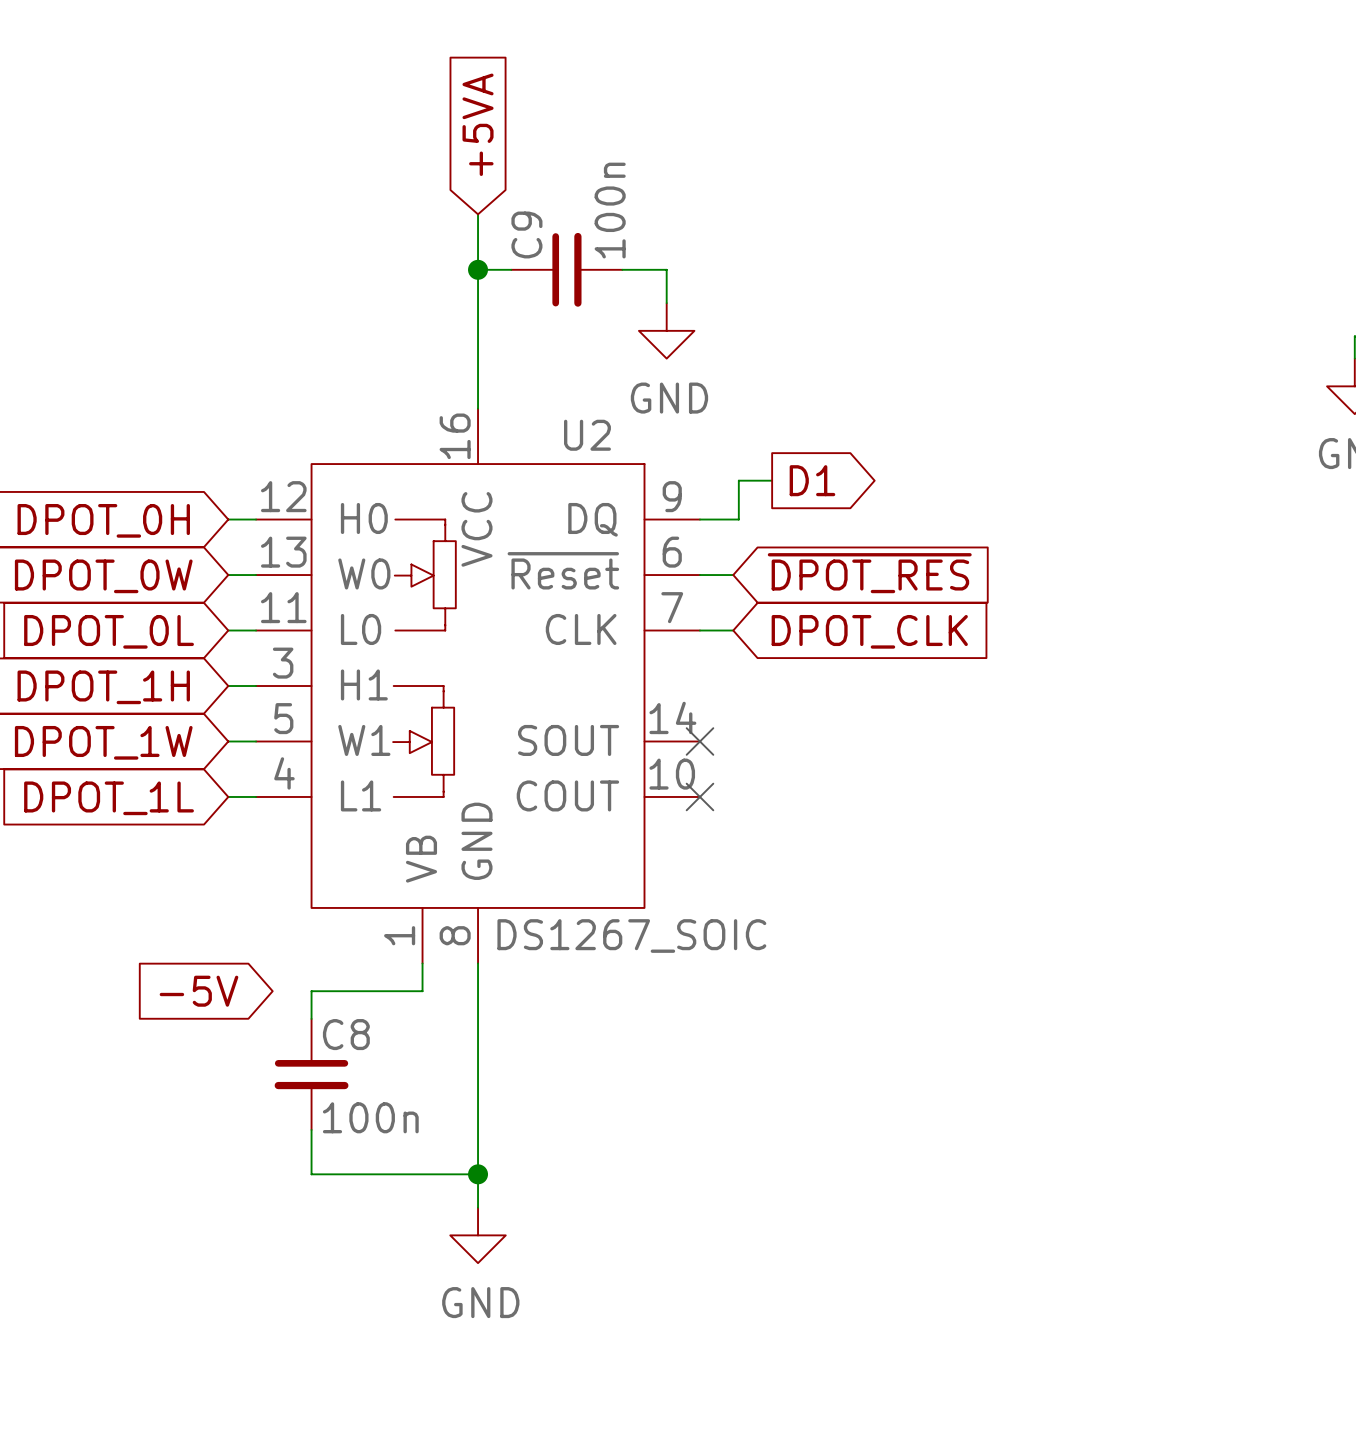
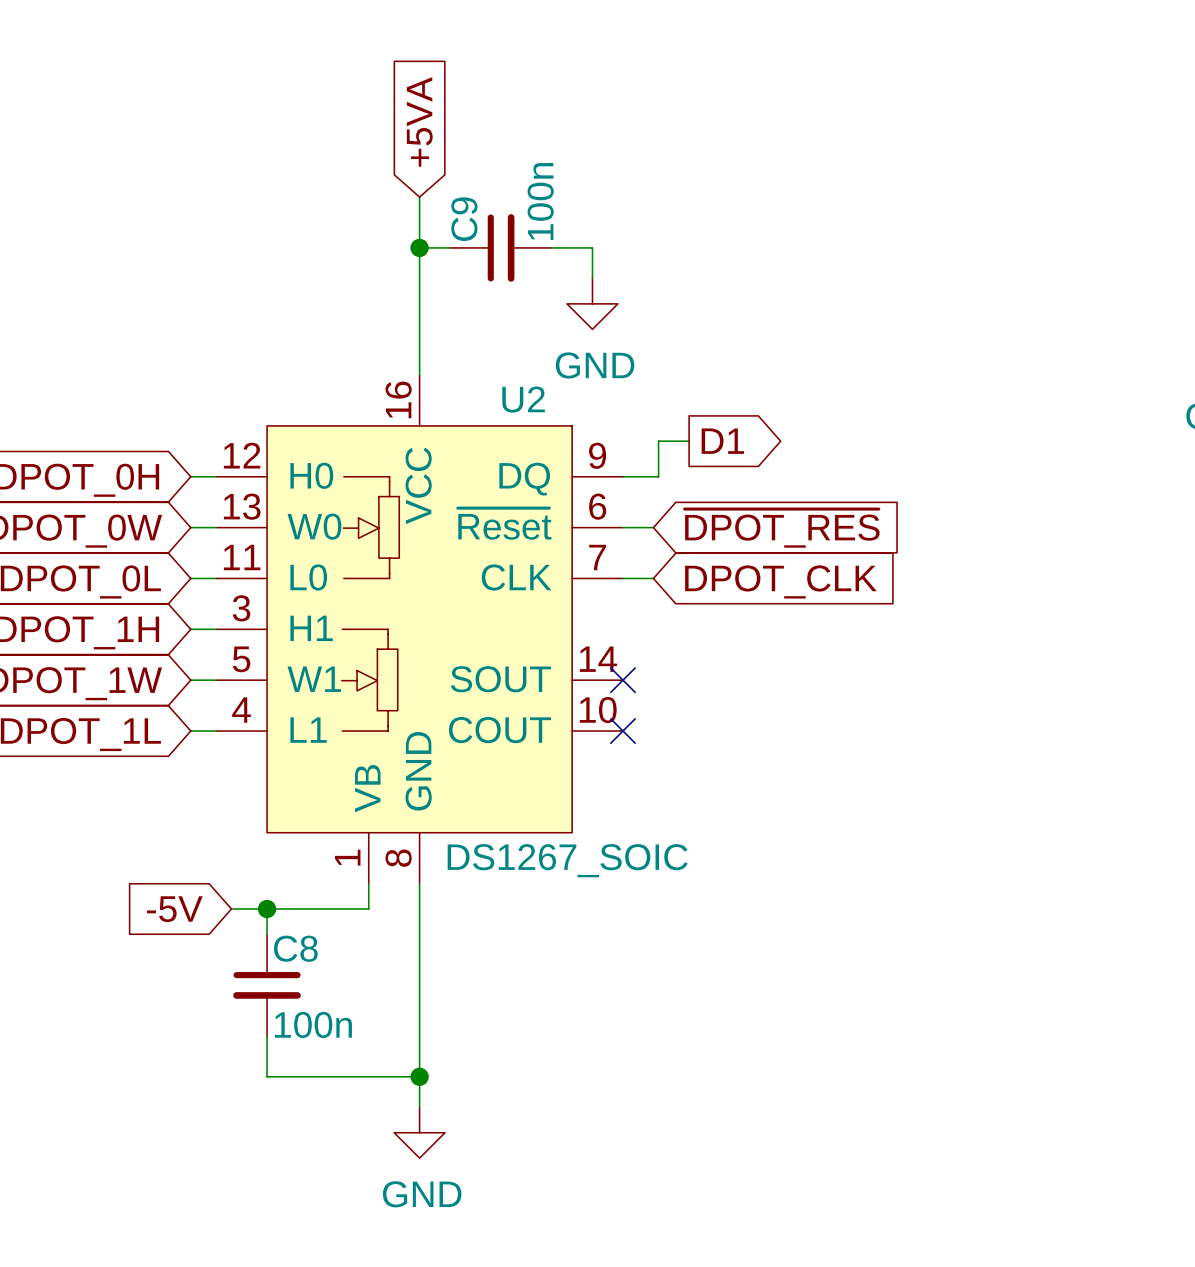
wire: none -> (231, 908) (267, 908)
junction: none -> (267, 908)

